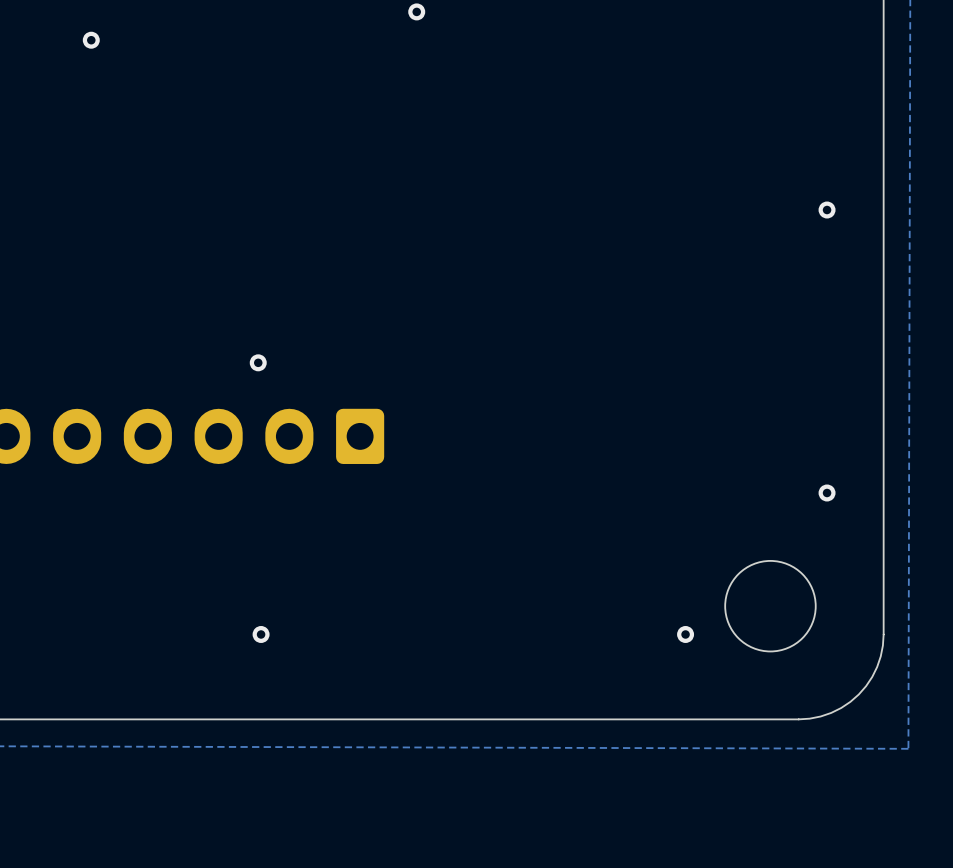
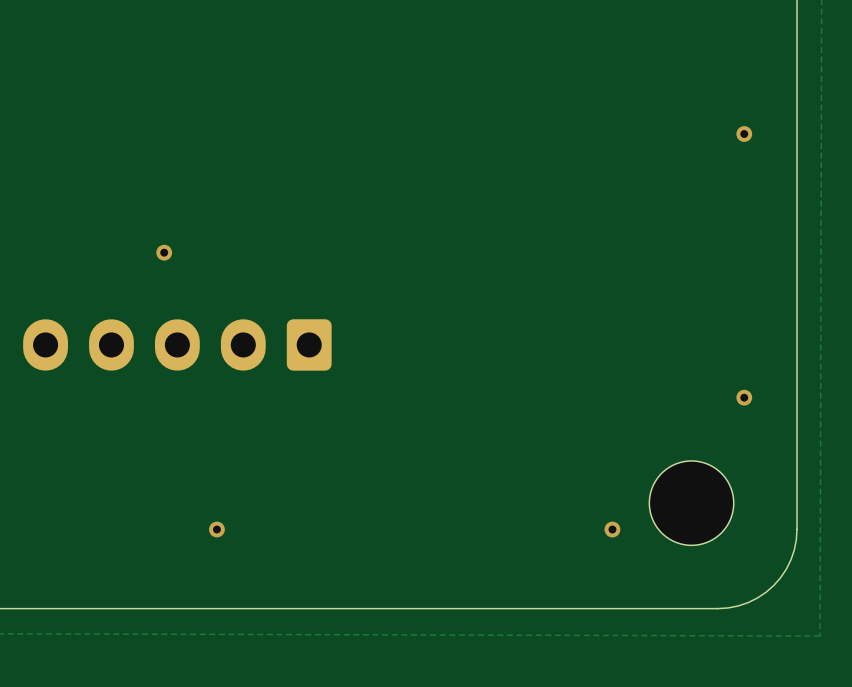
via position: (258, 362) -> (164, 252)

